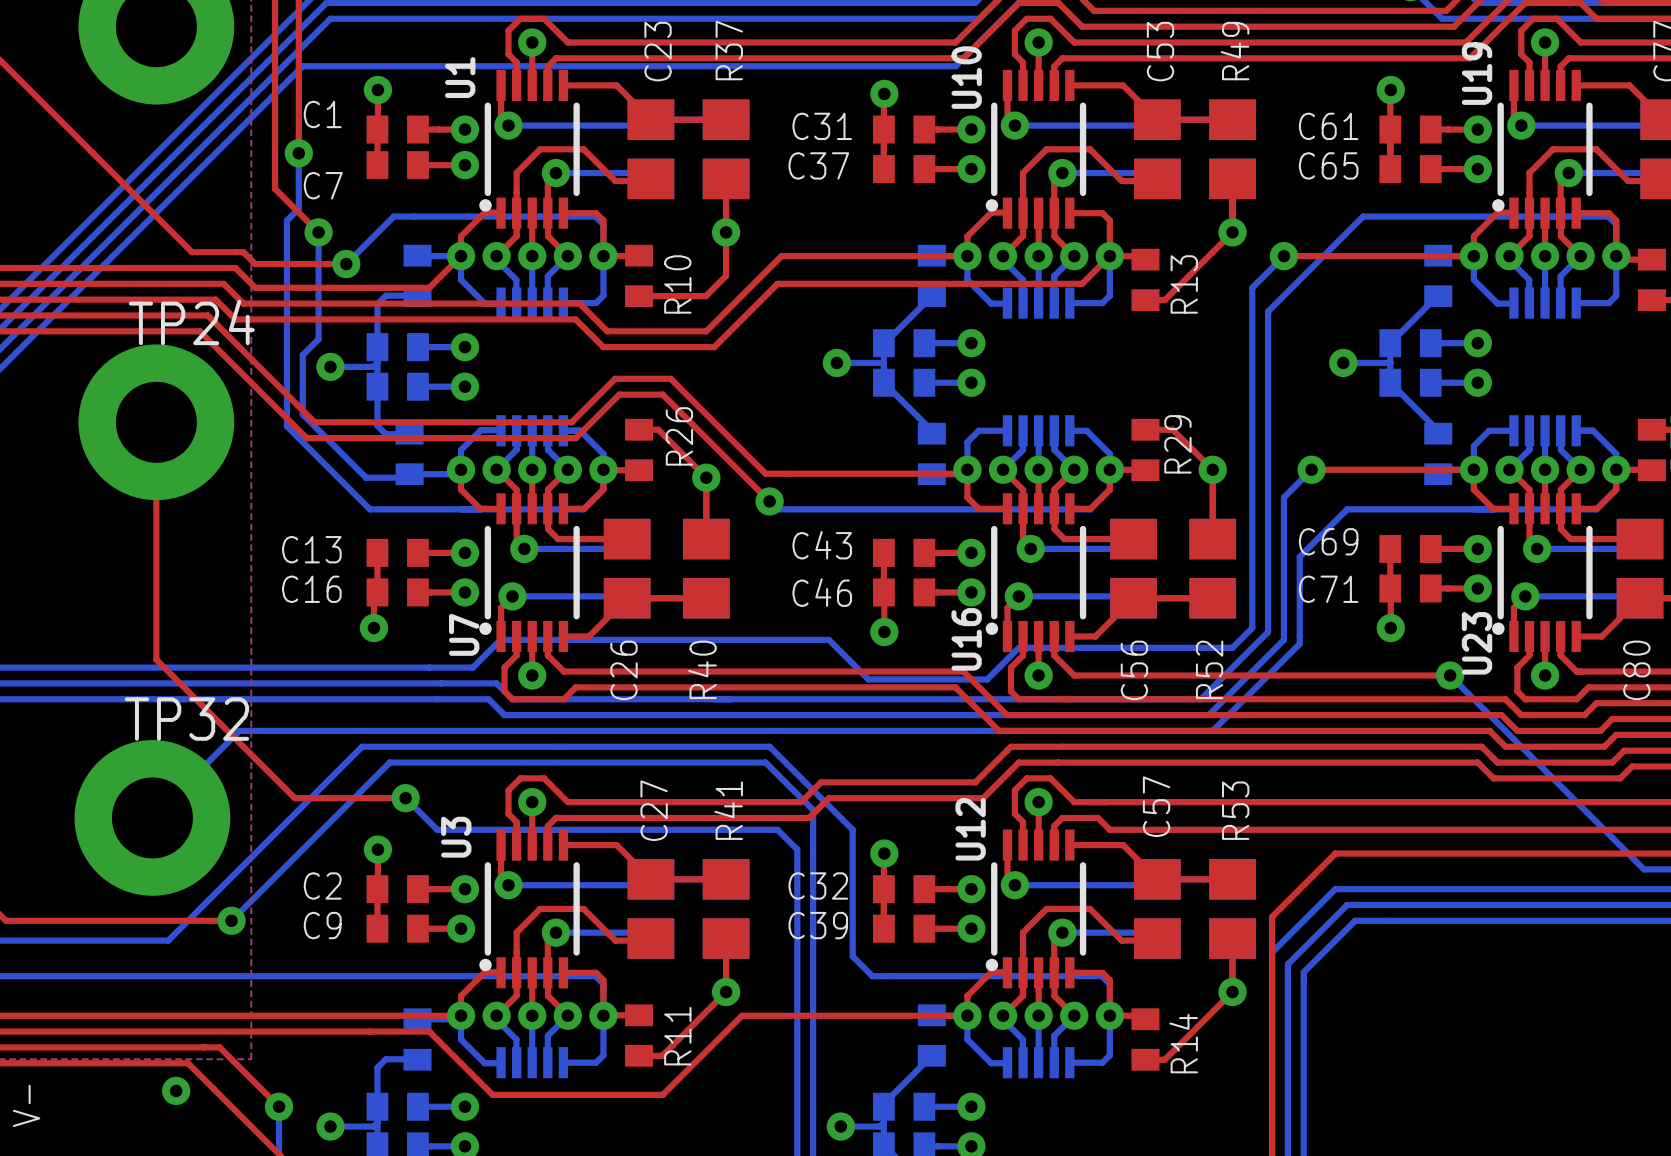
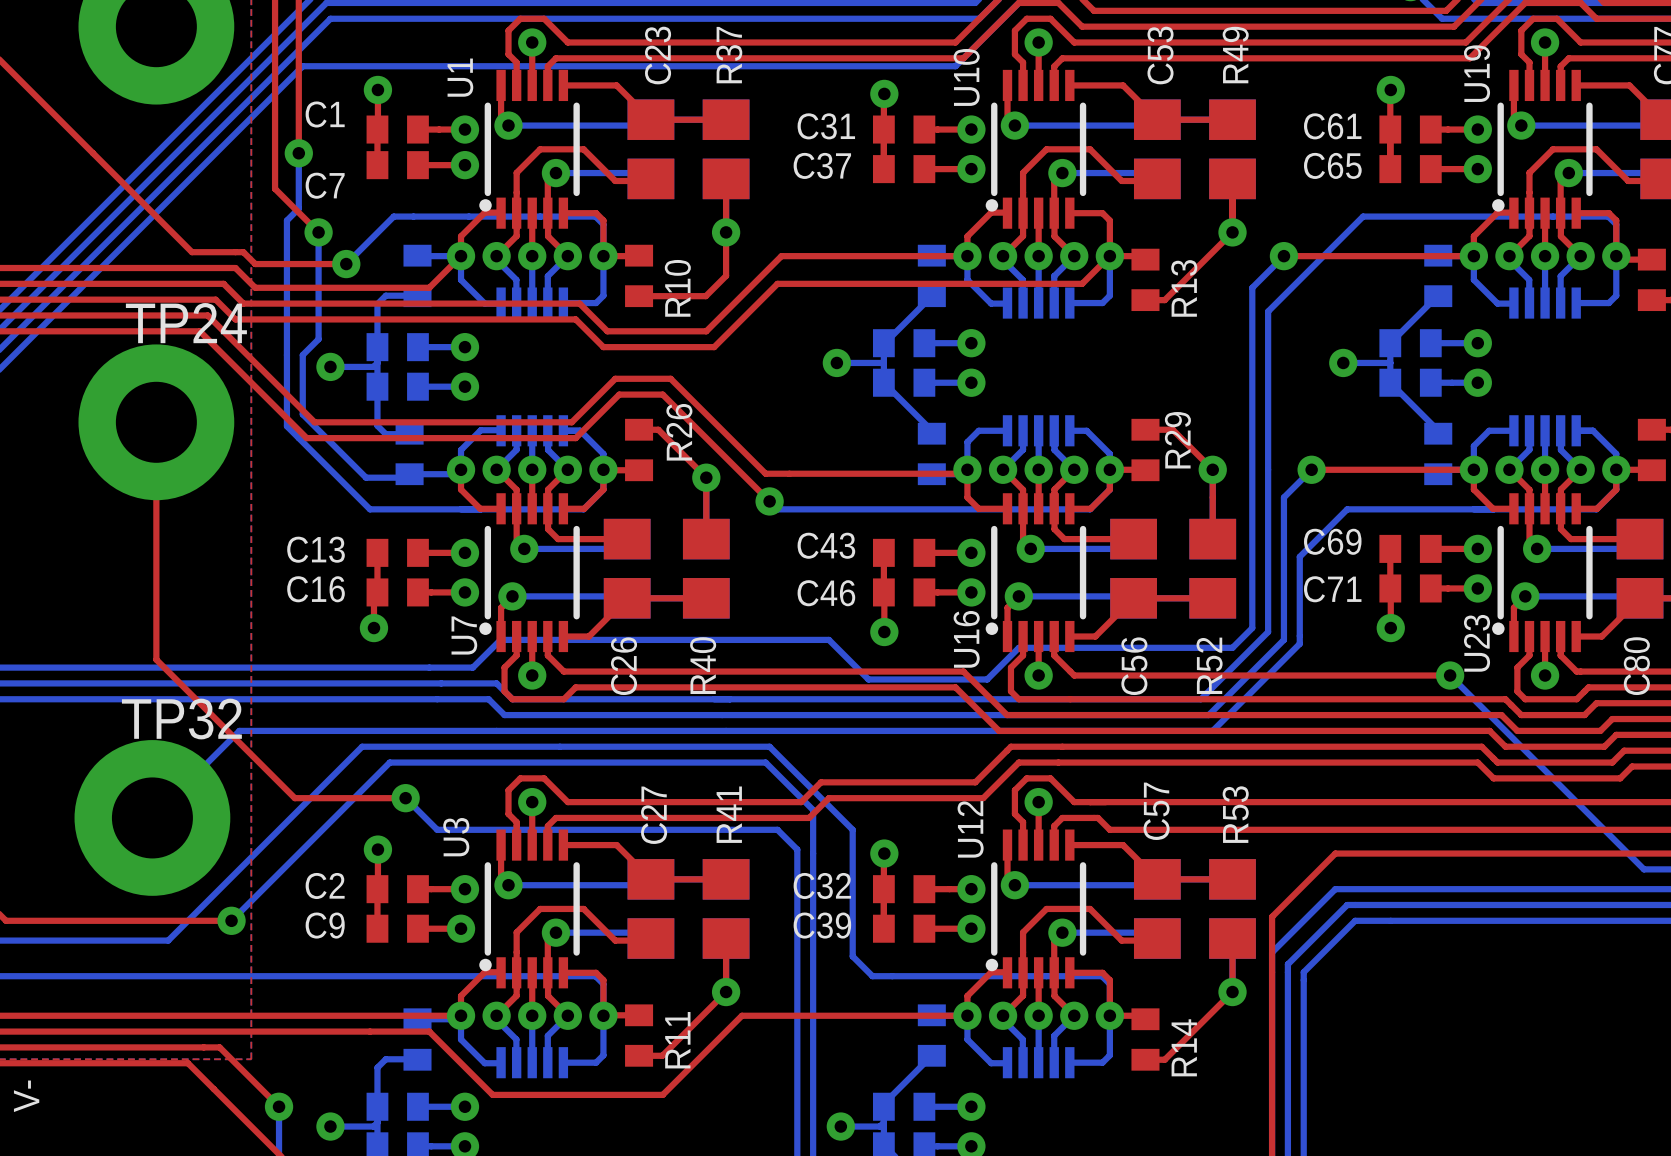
via: (176, 1090) -> none

